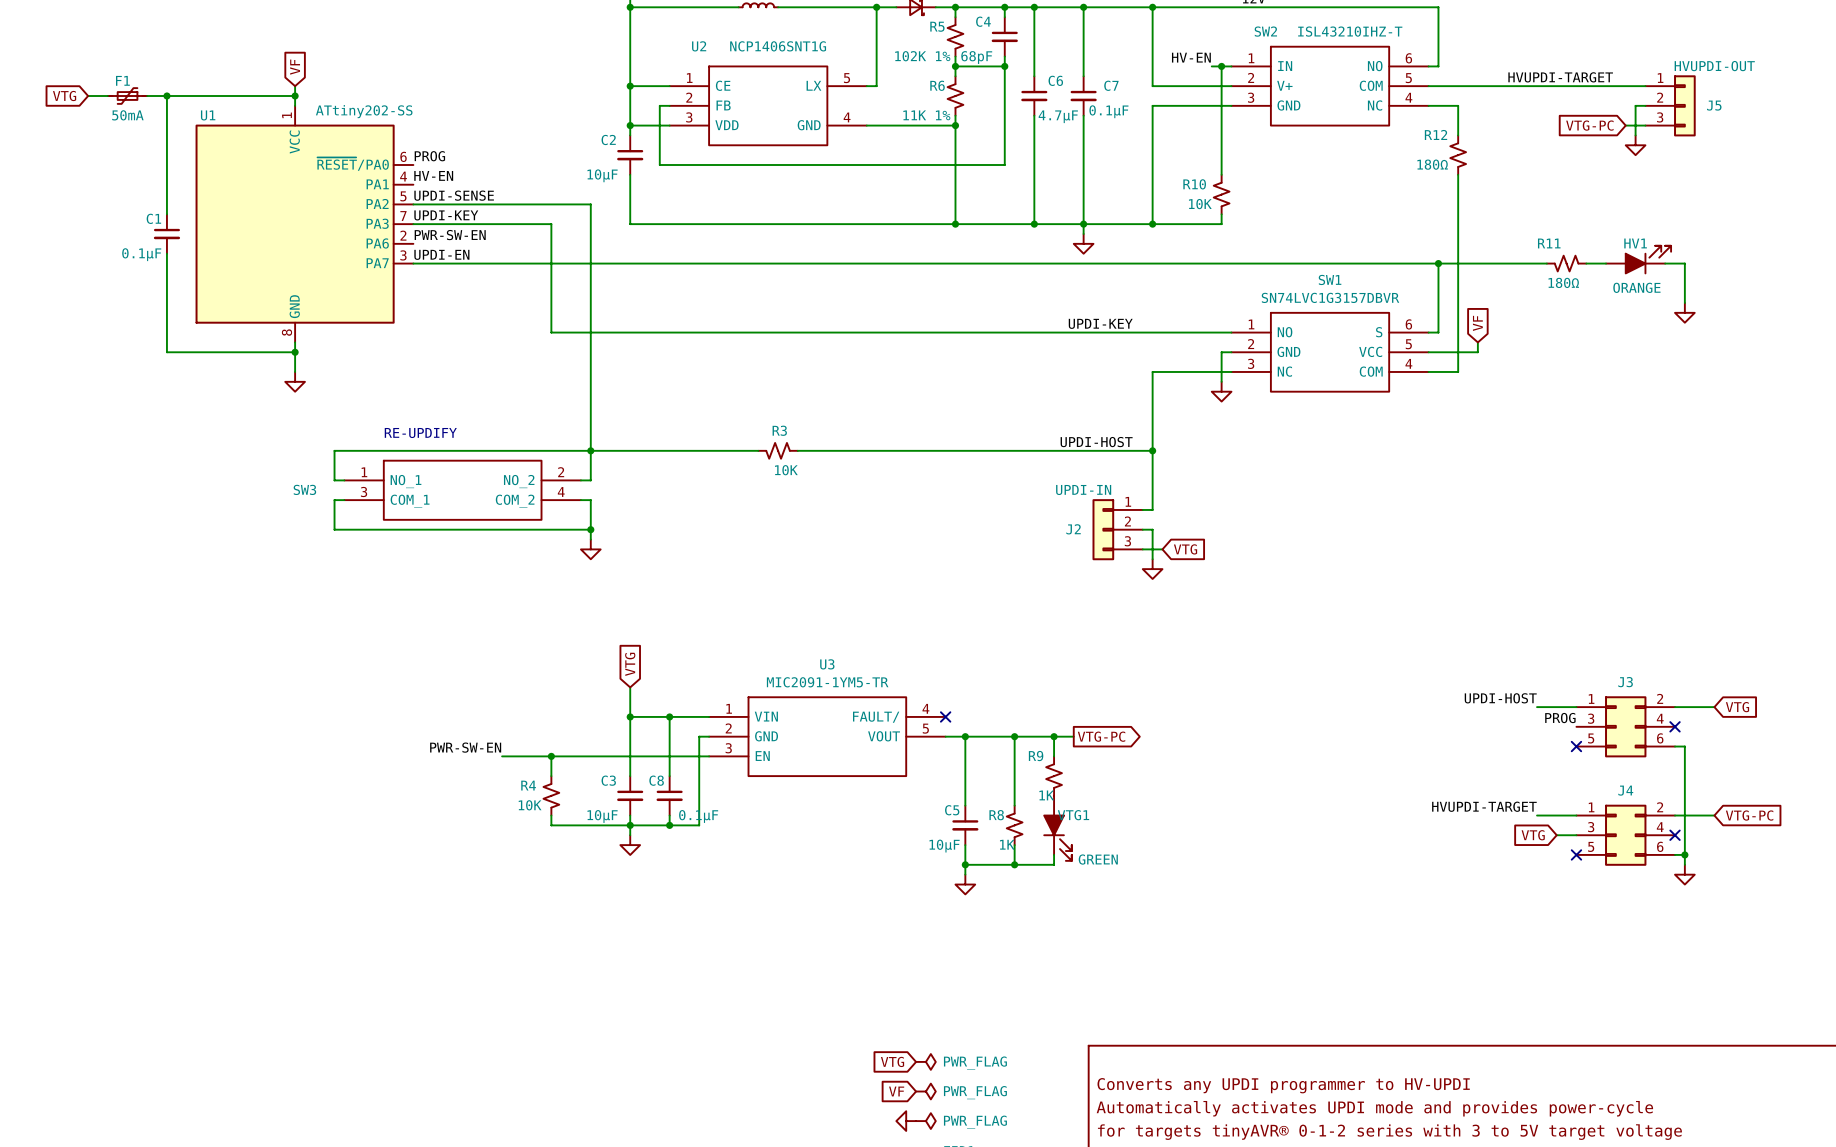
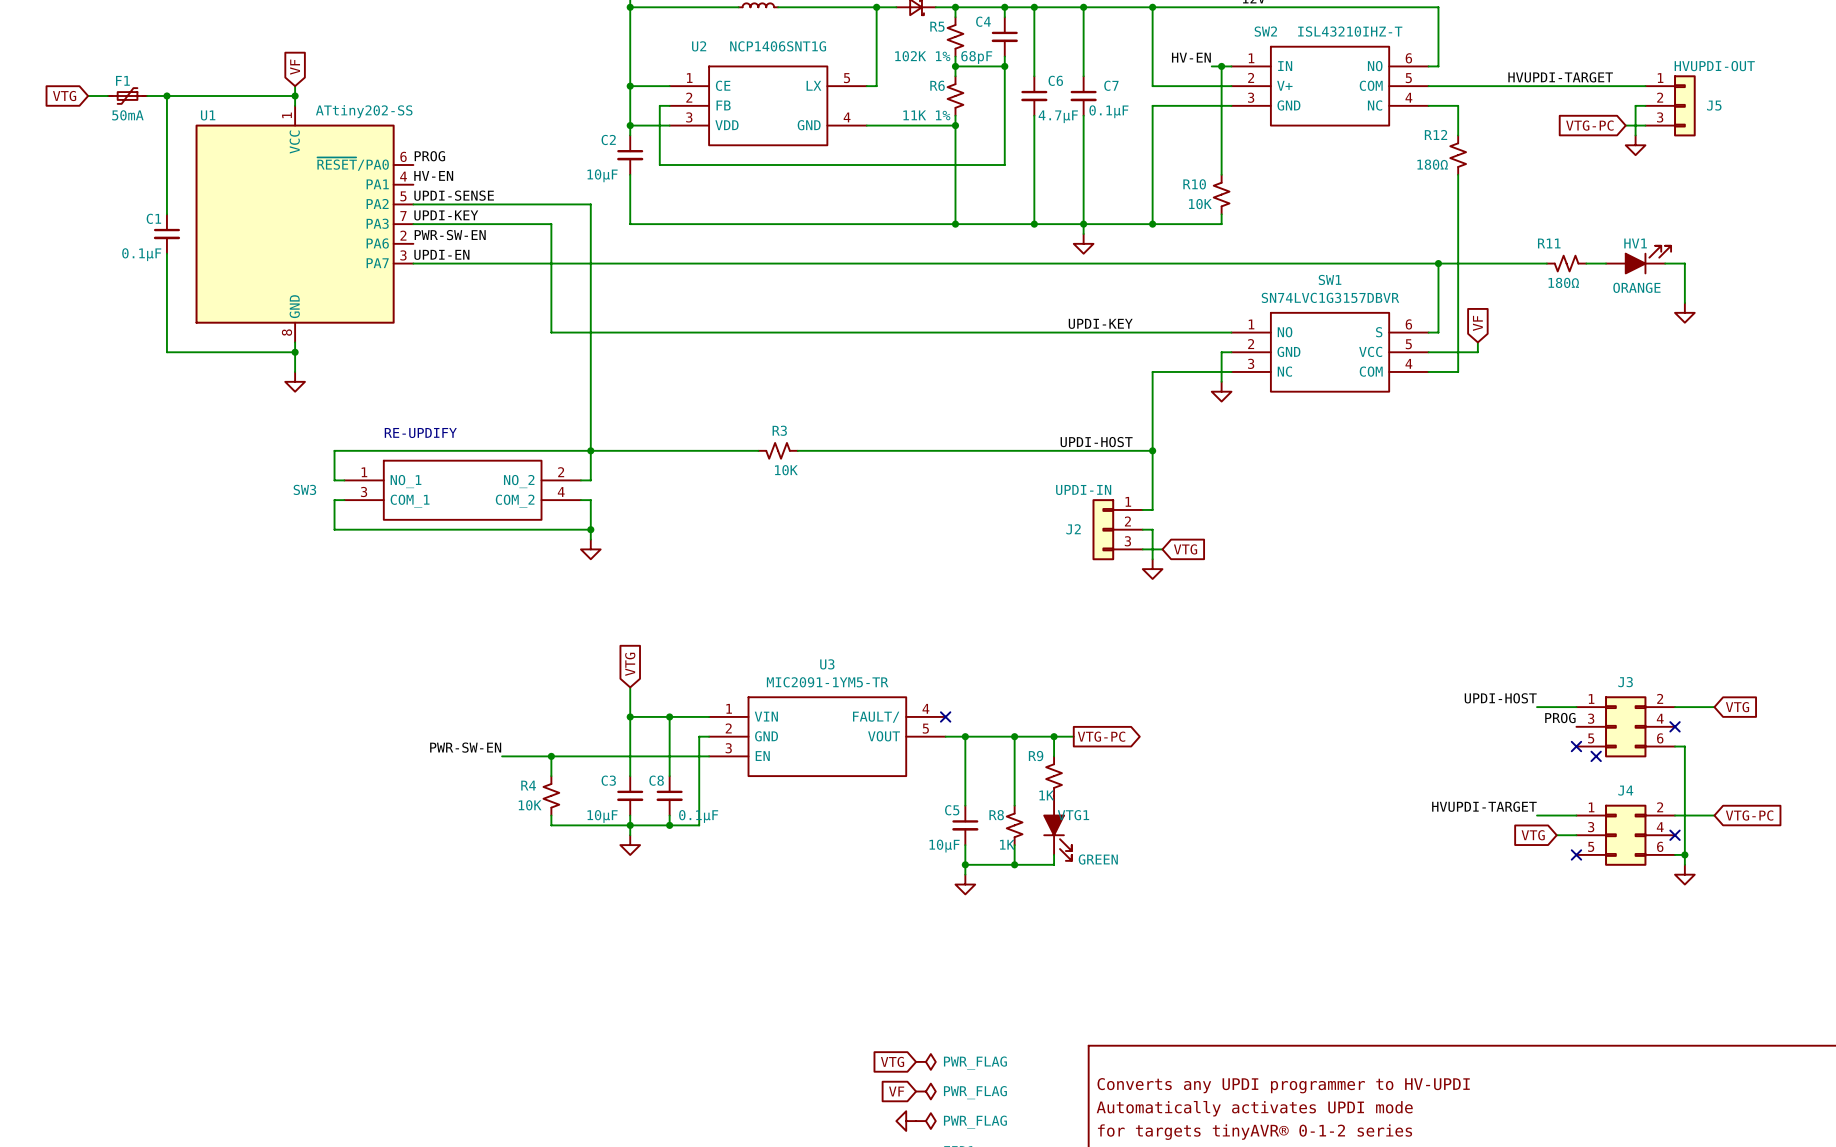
no-connect mark: none -> (1596, 756)
title block: Automatically activates UPDI mode and provides power-cycle (1374, 1108) -> Automatically activates UPDI mode (1254, 1108)
title block: for targets tinyAVR® 0-1-2 series with 3 to 5V target voltage (1389, 1132) -> for targets tinyAVR® 0-1-2 series (1255, 1132)

